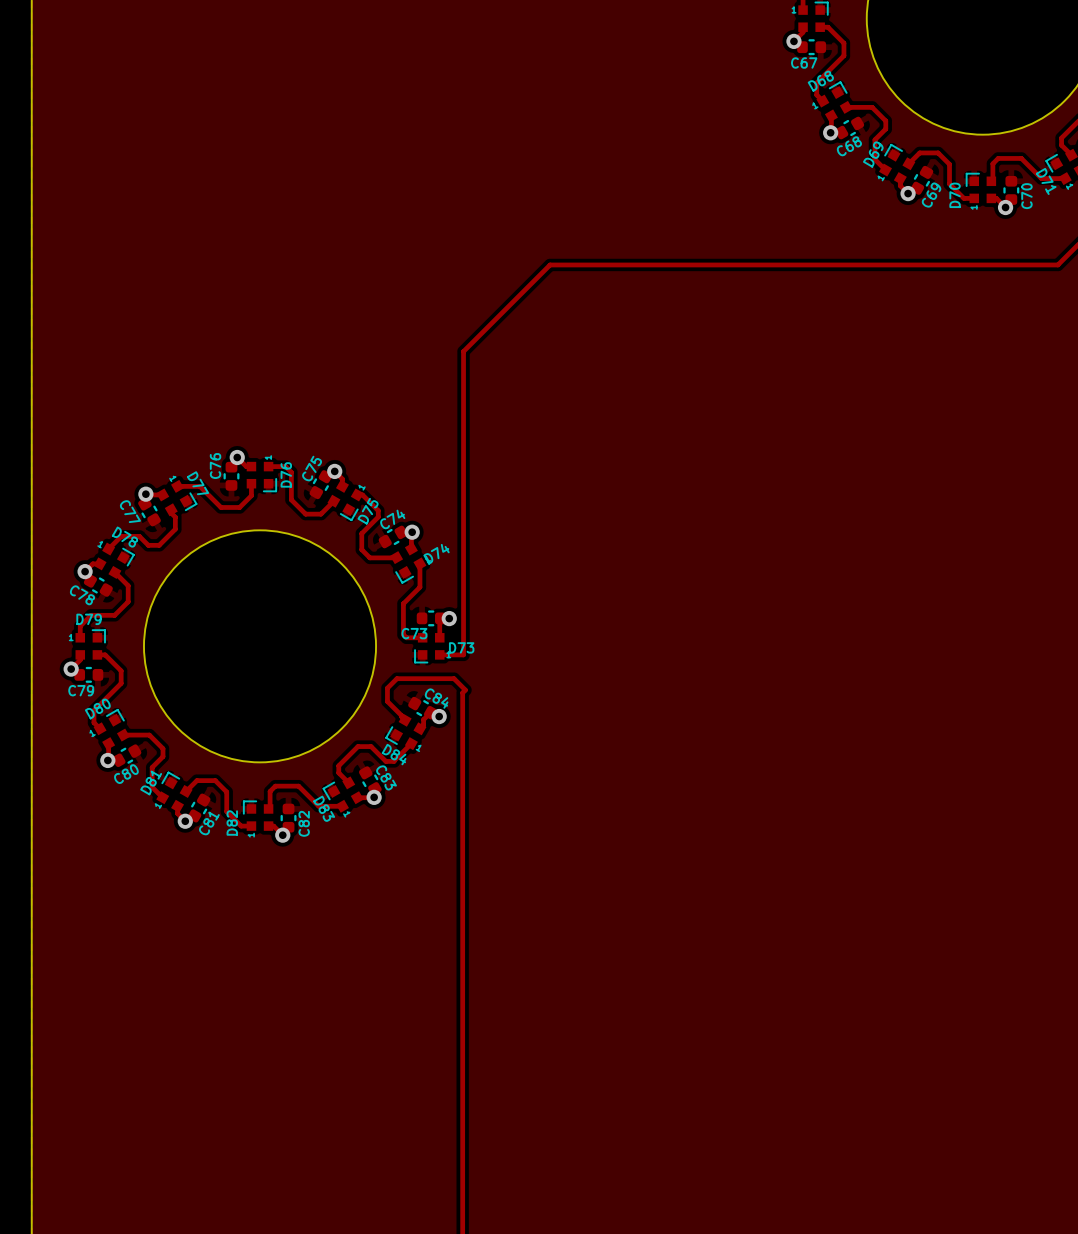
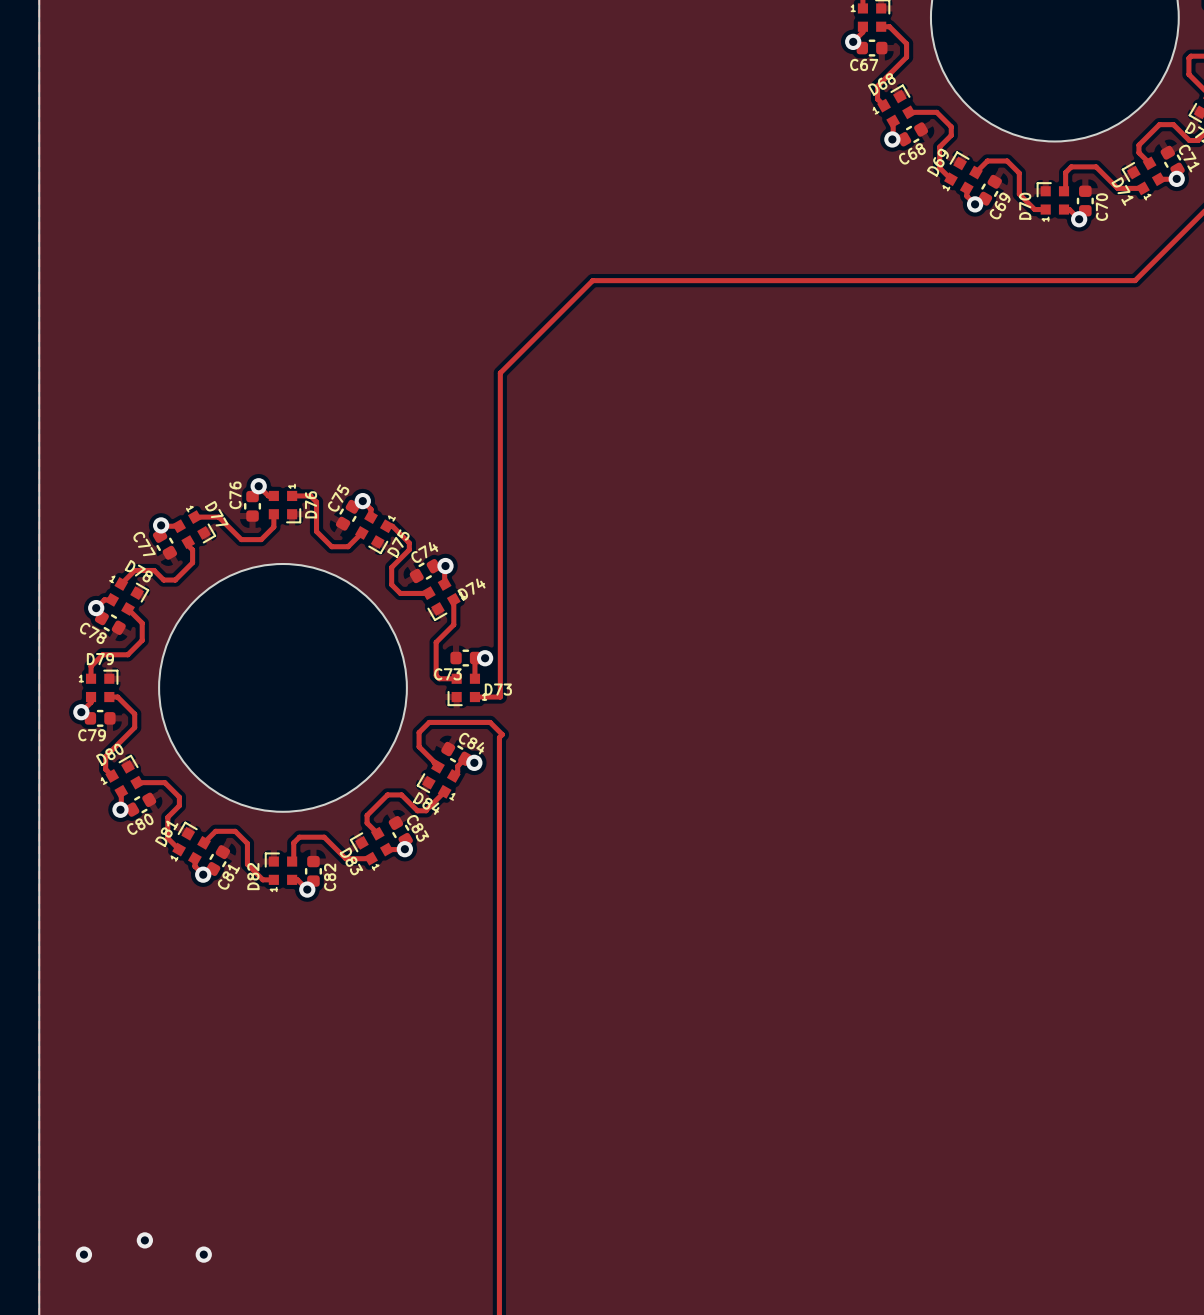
via: none -> (144, 1240)
via: none -> (83, 1254)
via: none -> (203, 1254)

